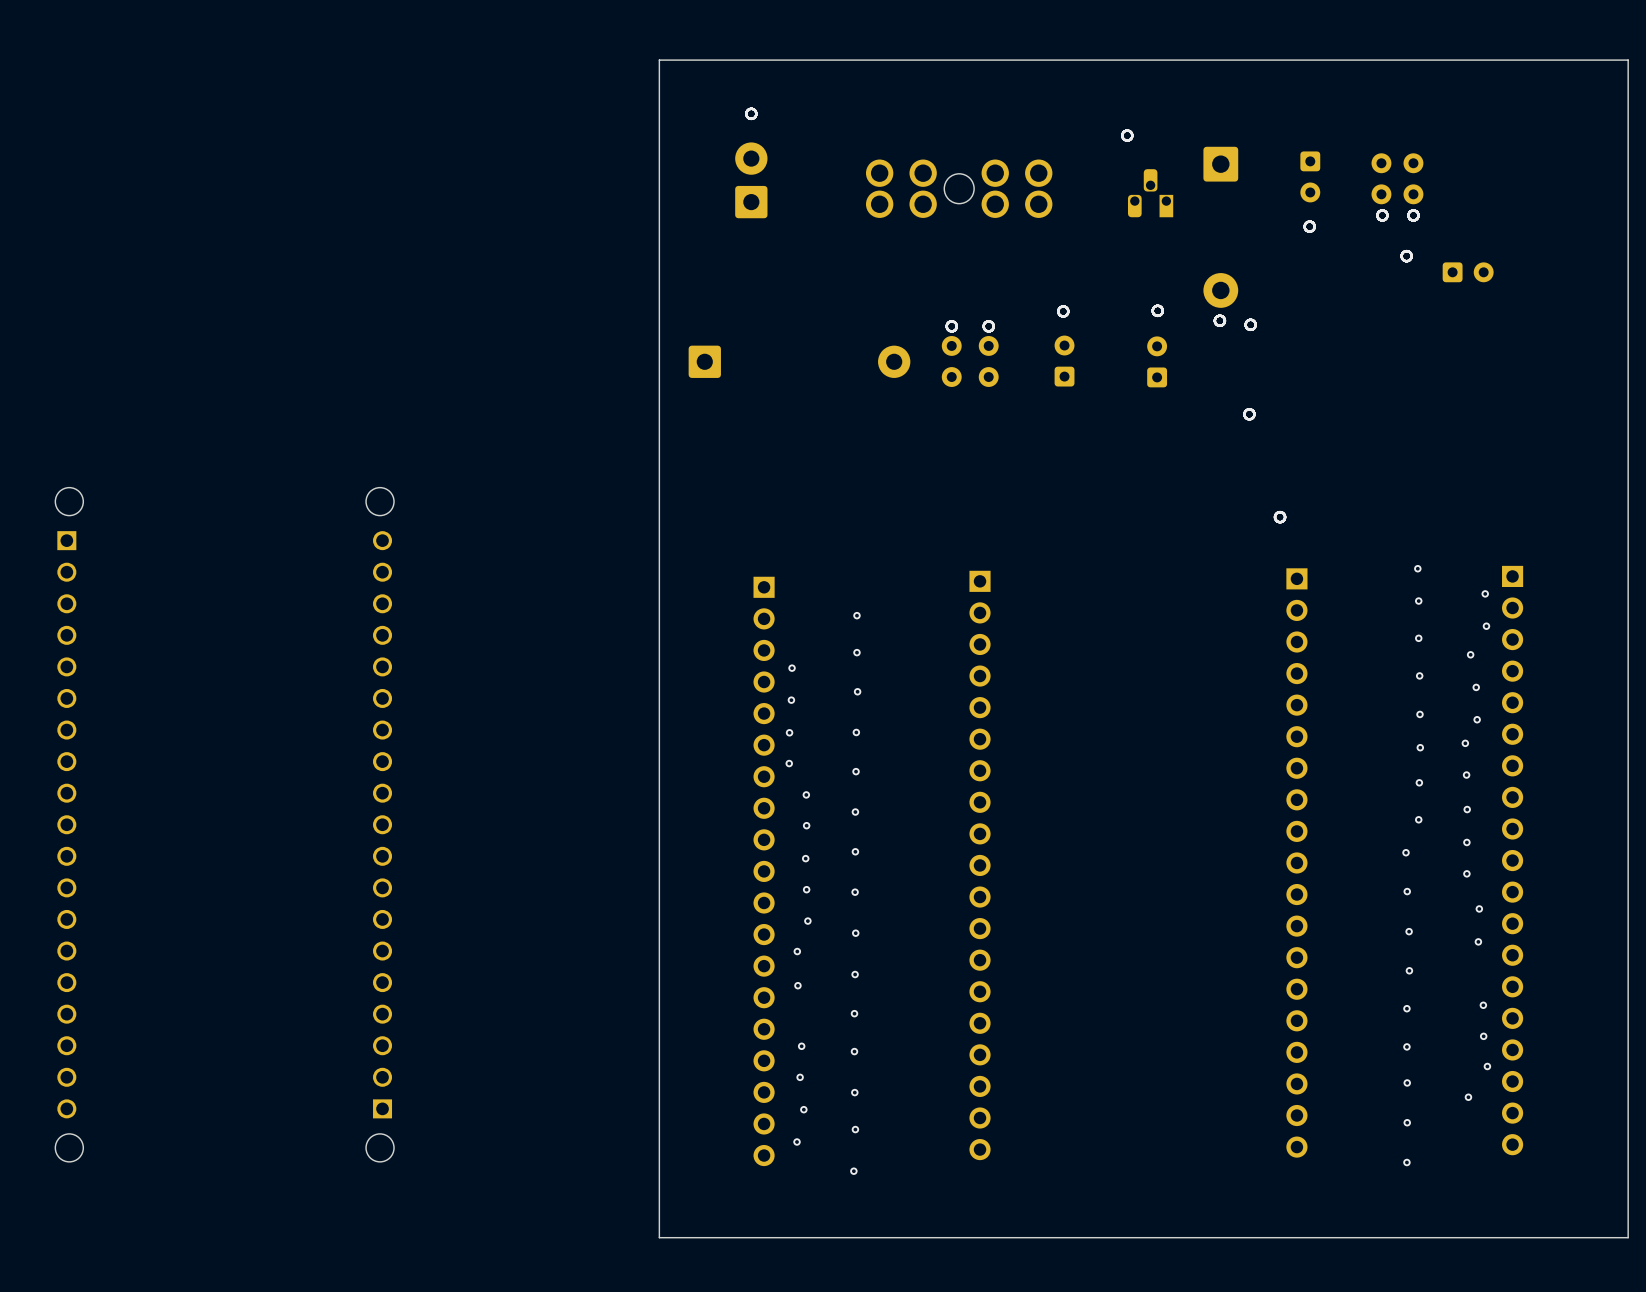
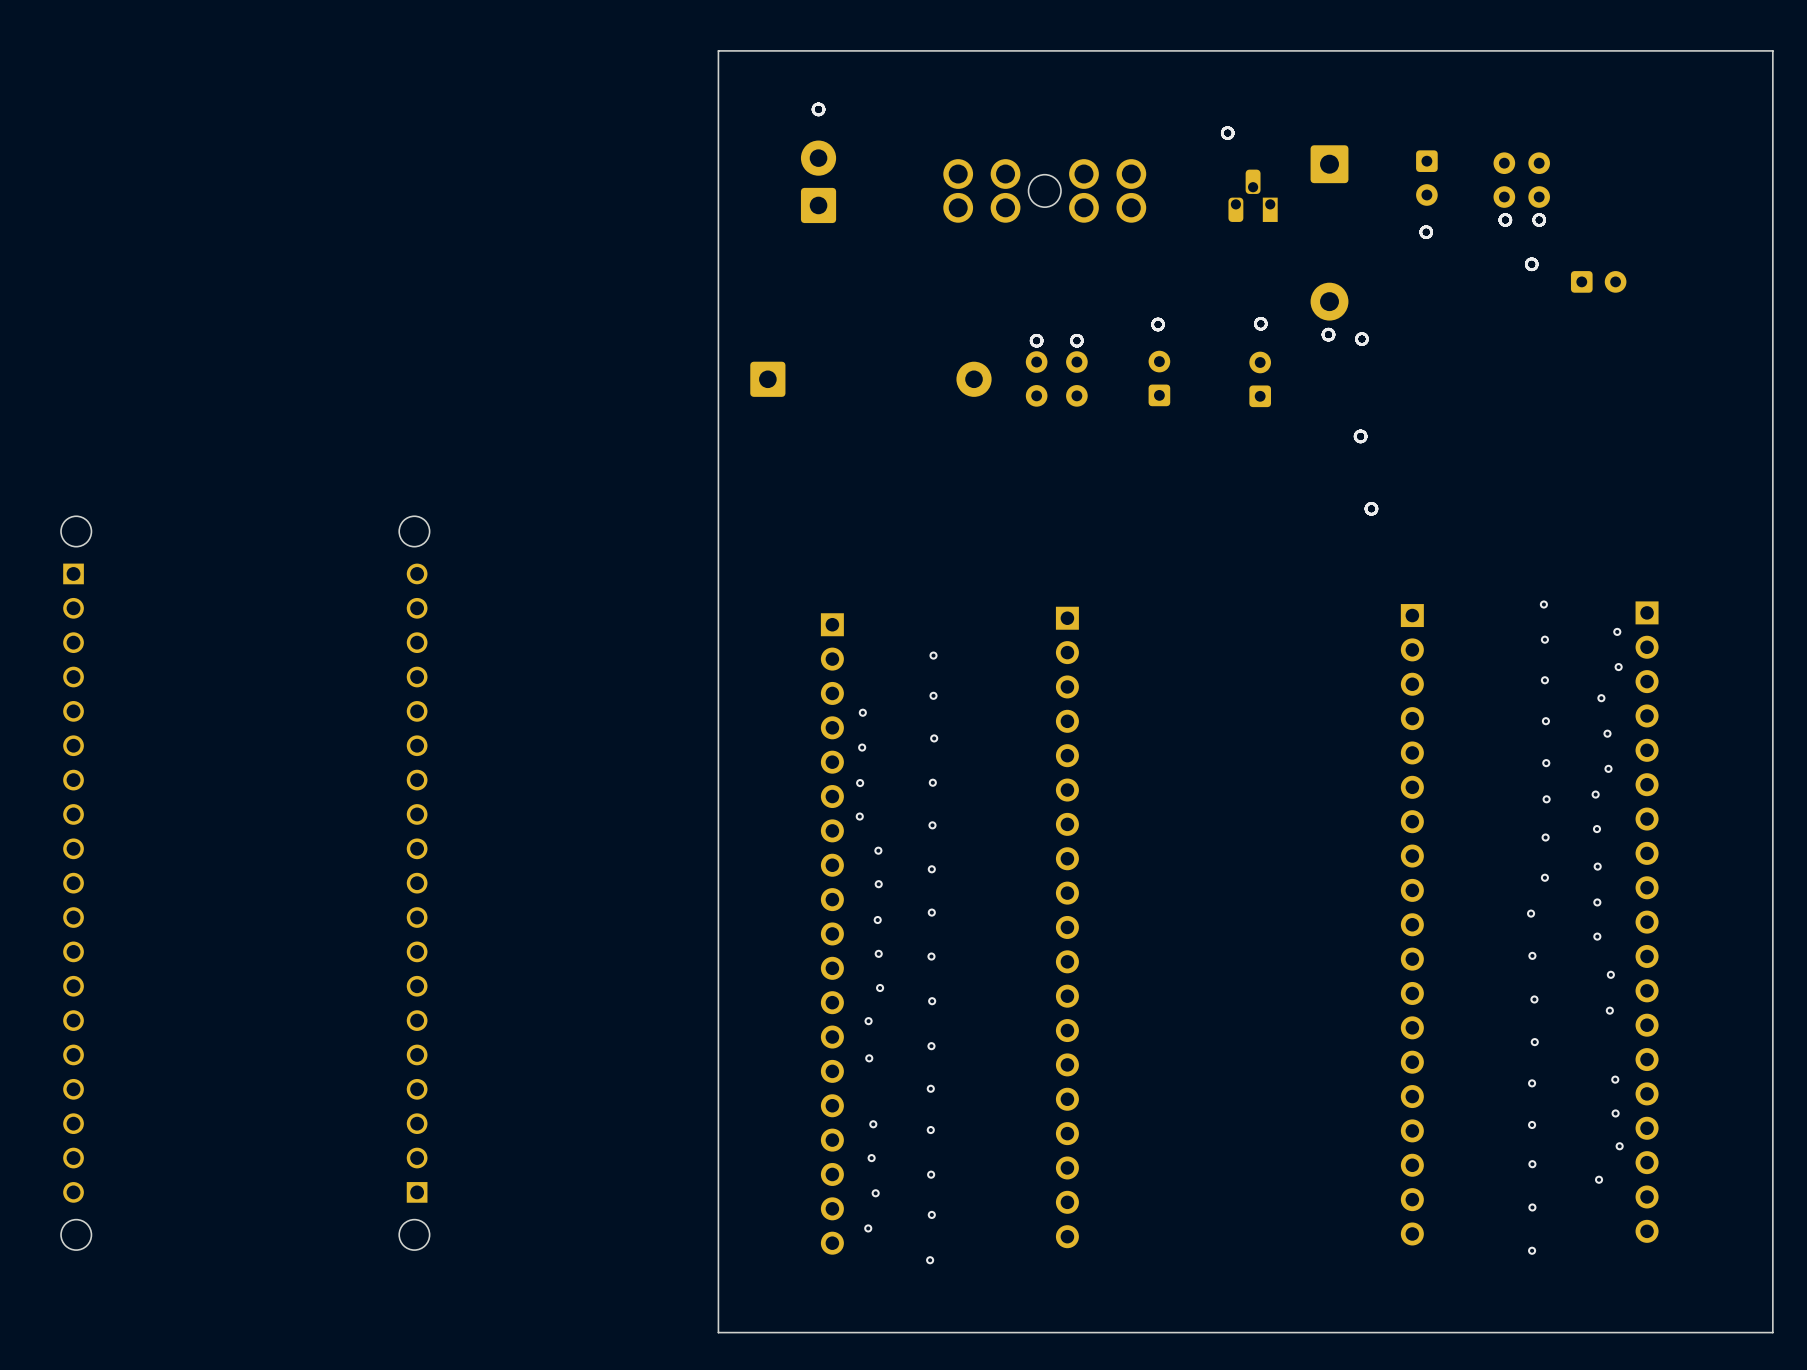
via position: (1280, 517) -> (1371, 508)

